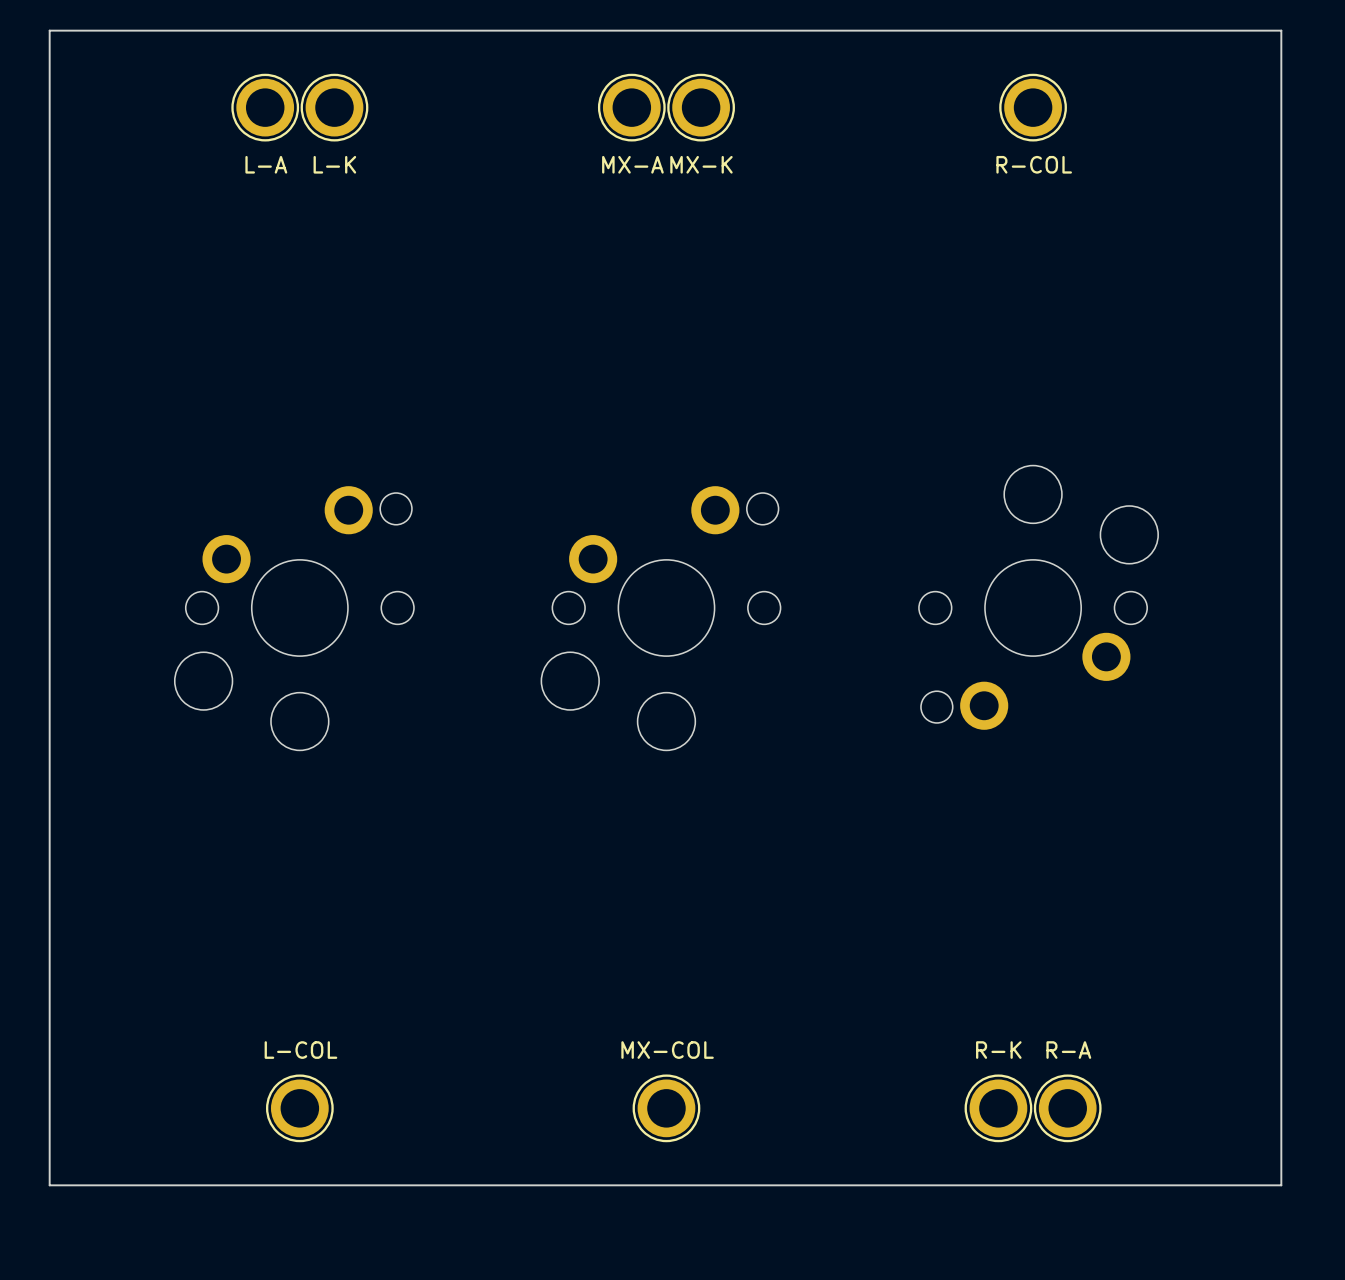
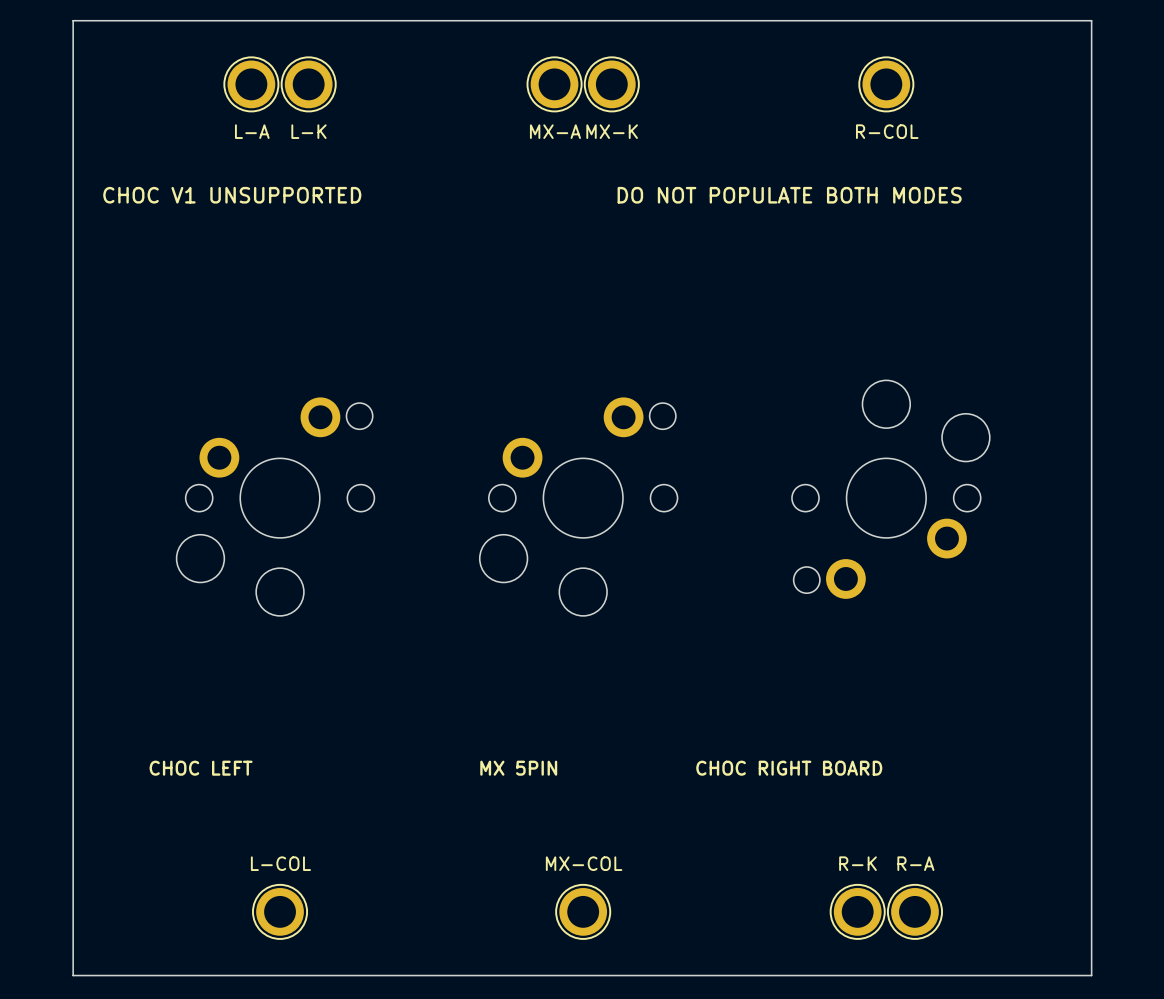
text: none -> CHOC V1 UNSUPPORTED (232, 195)
text: none -> DO NOT POPULATE BOTH MODES (789, 195)
text: none -> CHOC LEFT (201, 768)
text: none -> MX 5PIN (518, 768)
text: none -> CHOC RIGHT BOARD (789, 768)

